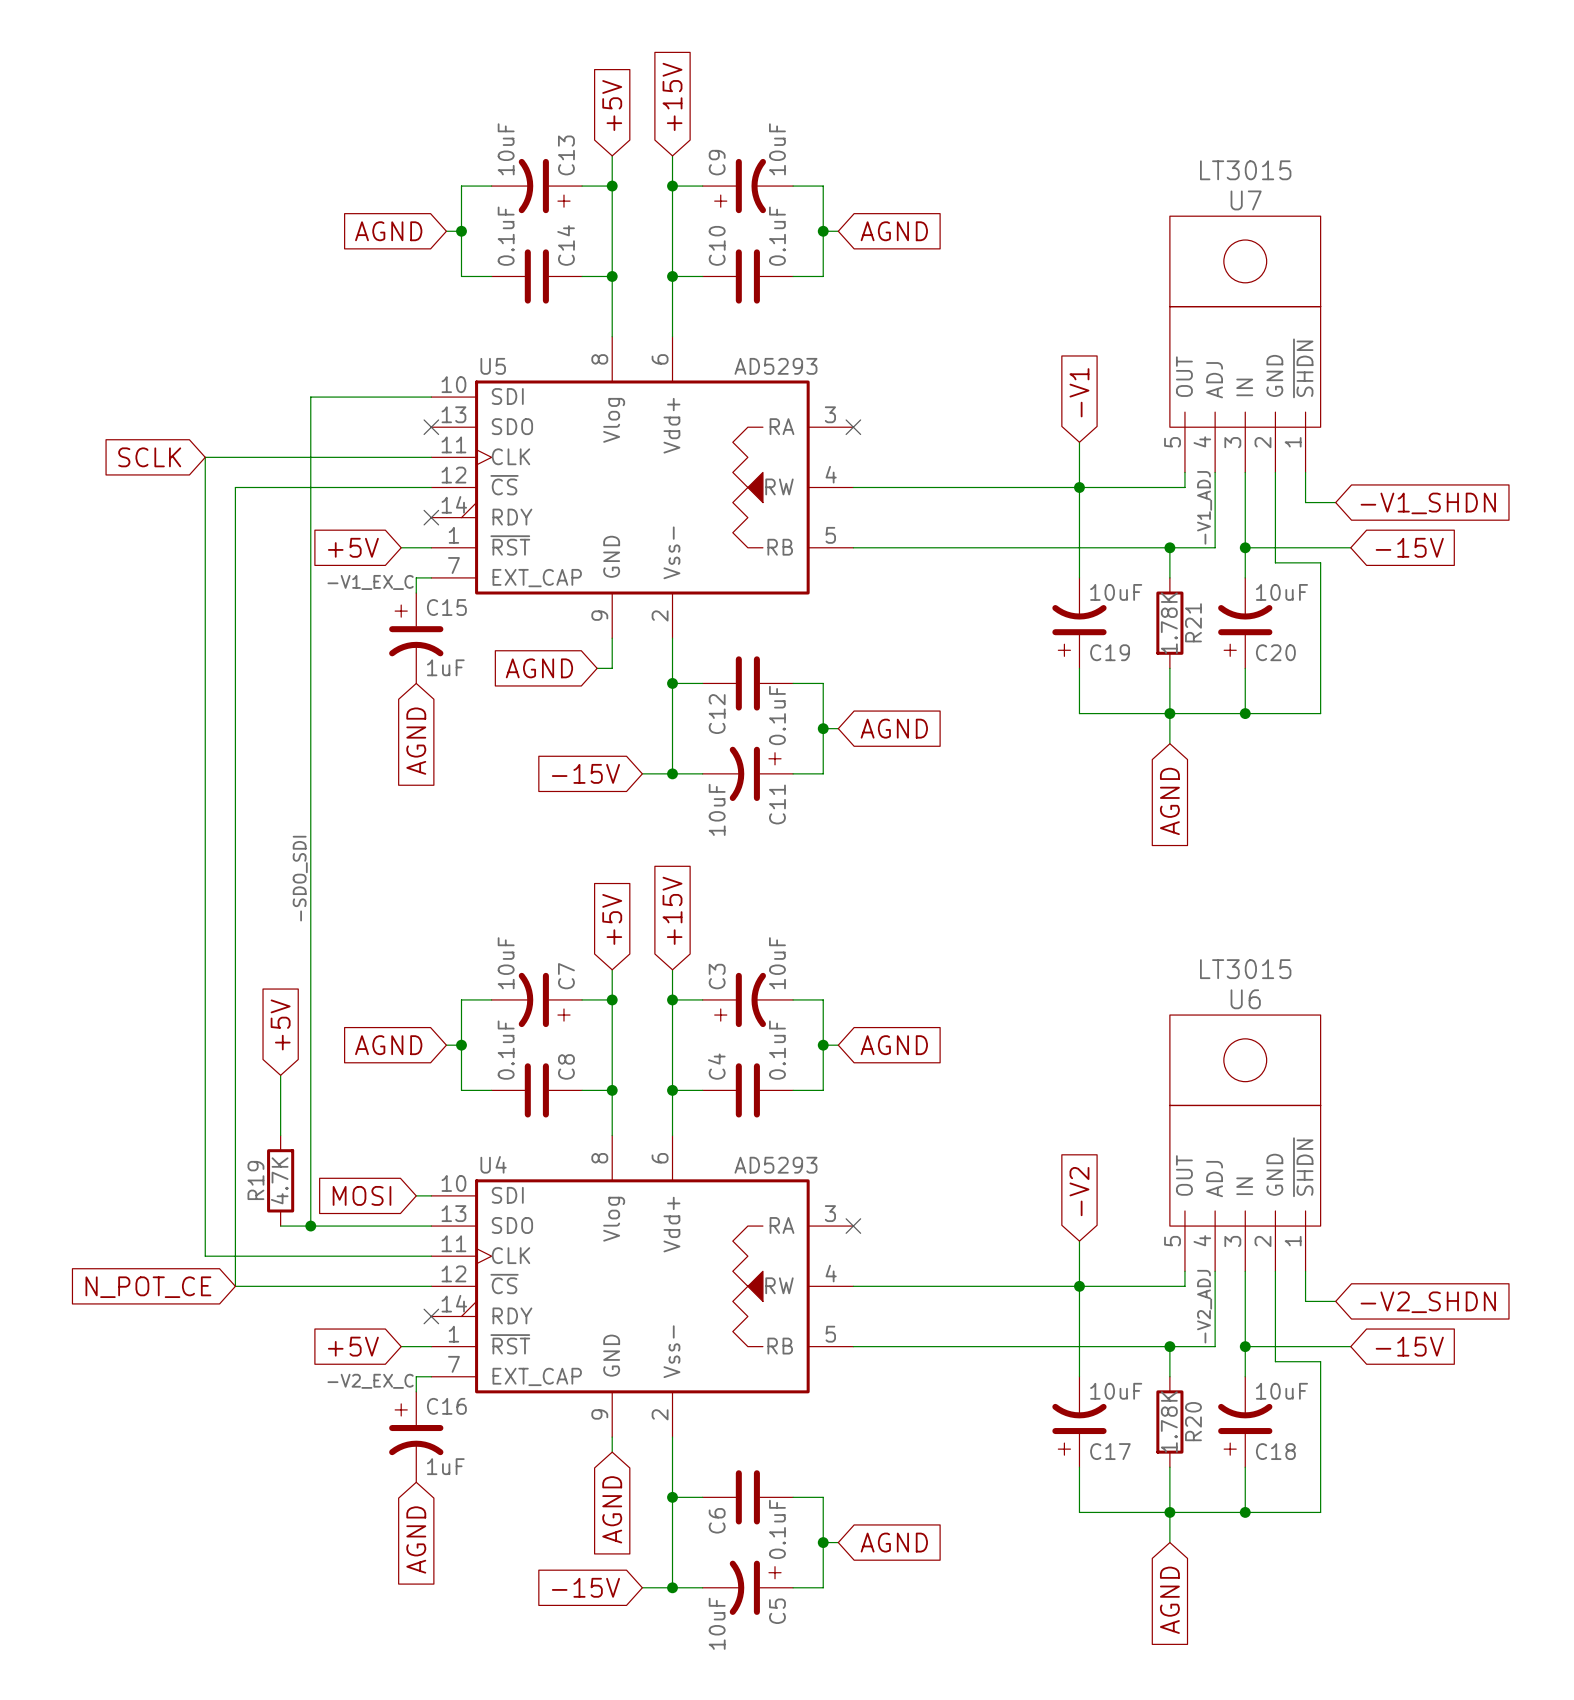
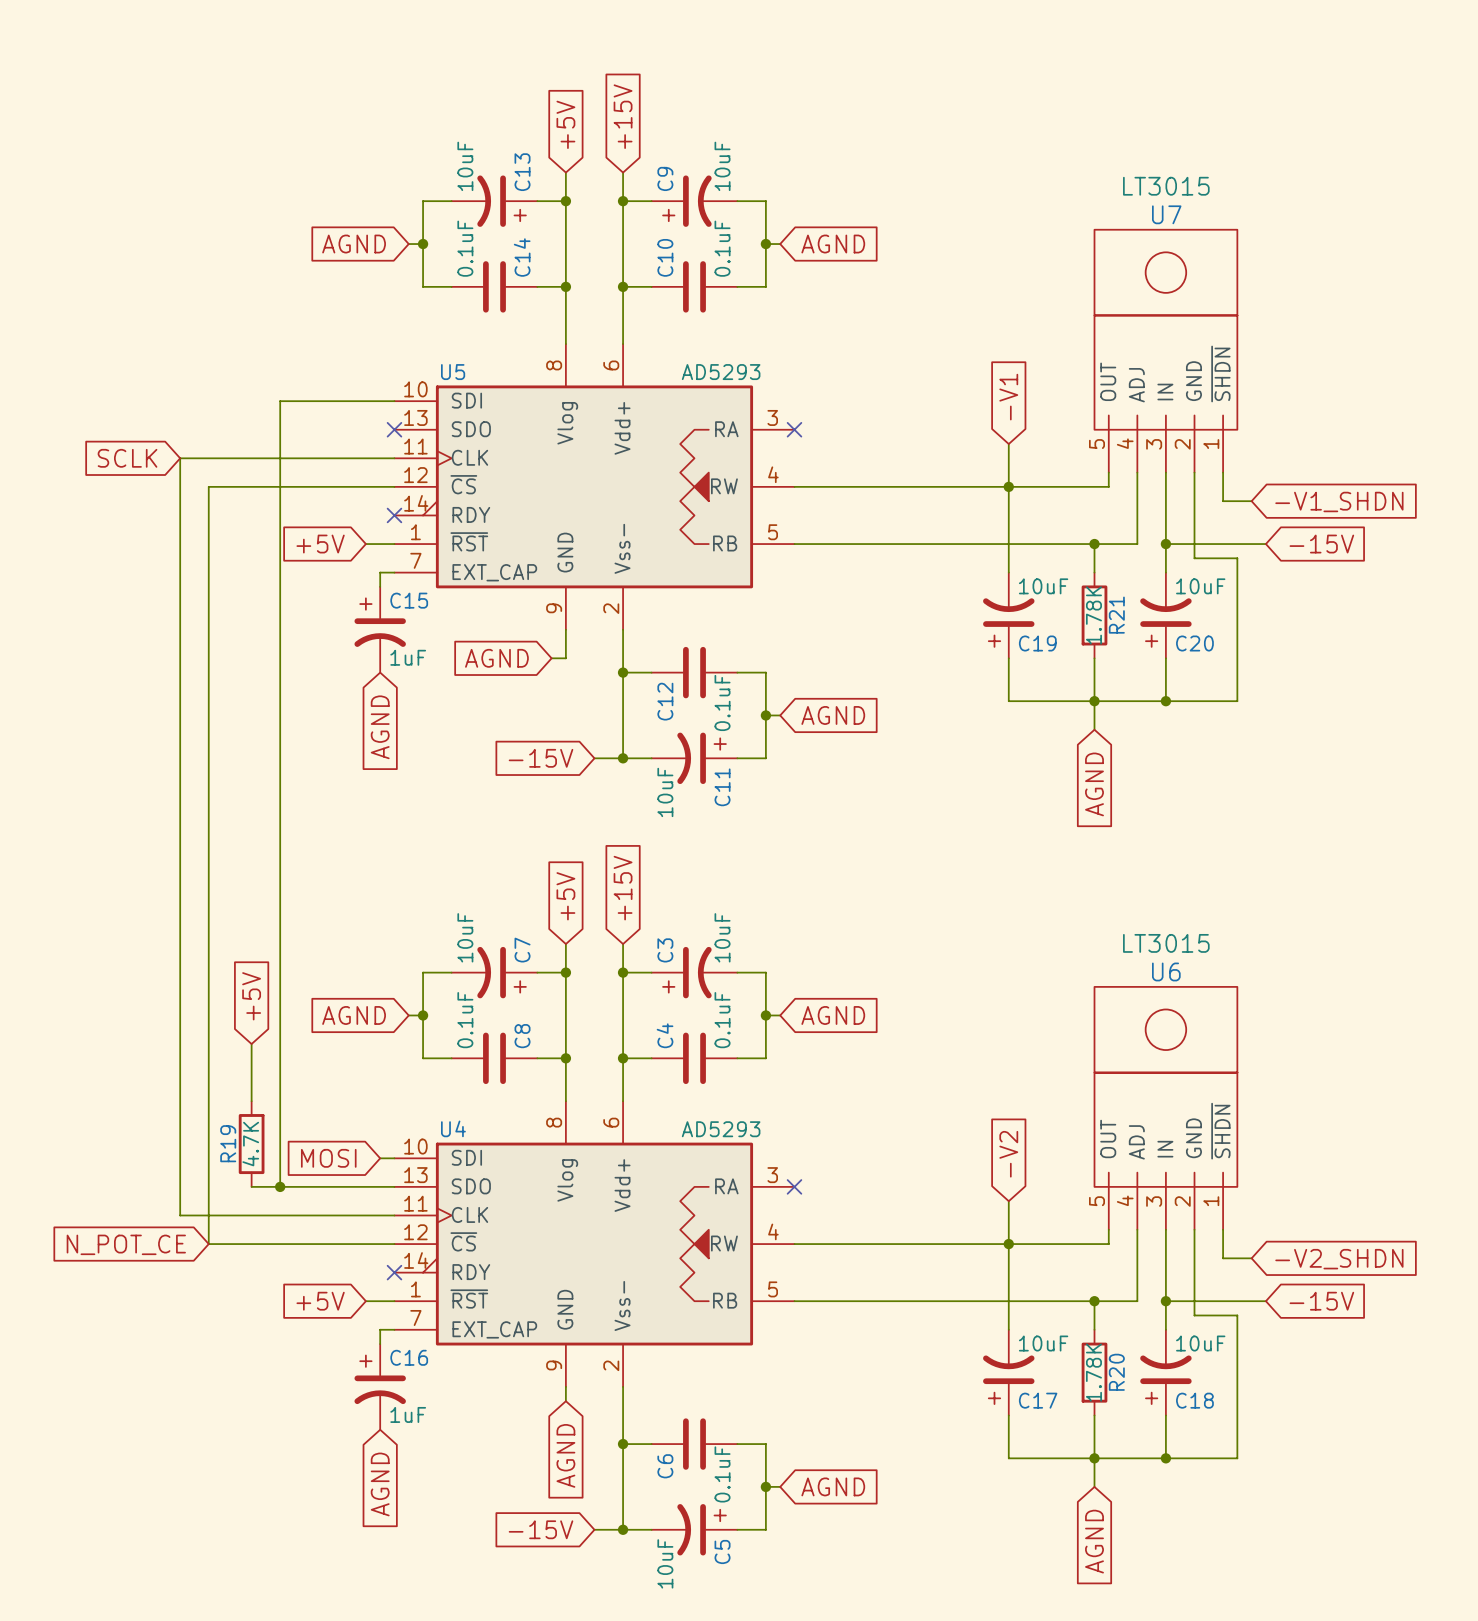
label: -V1_ADJ (1204, 507) -> none
label: -V1_EX_C (370, 582) -> none
label: -SDO_SDI (300, 878) -> none
label: -V2_ADJ (1204, 1306) -> none
label: -V2_EX_C (370, 1381) -> none

